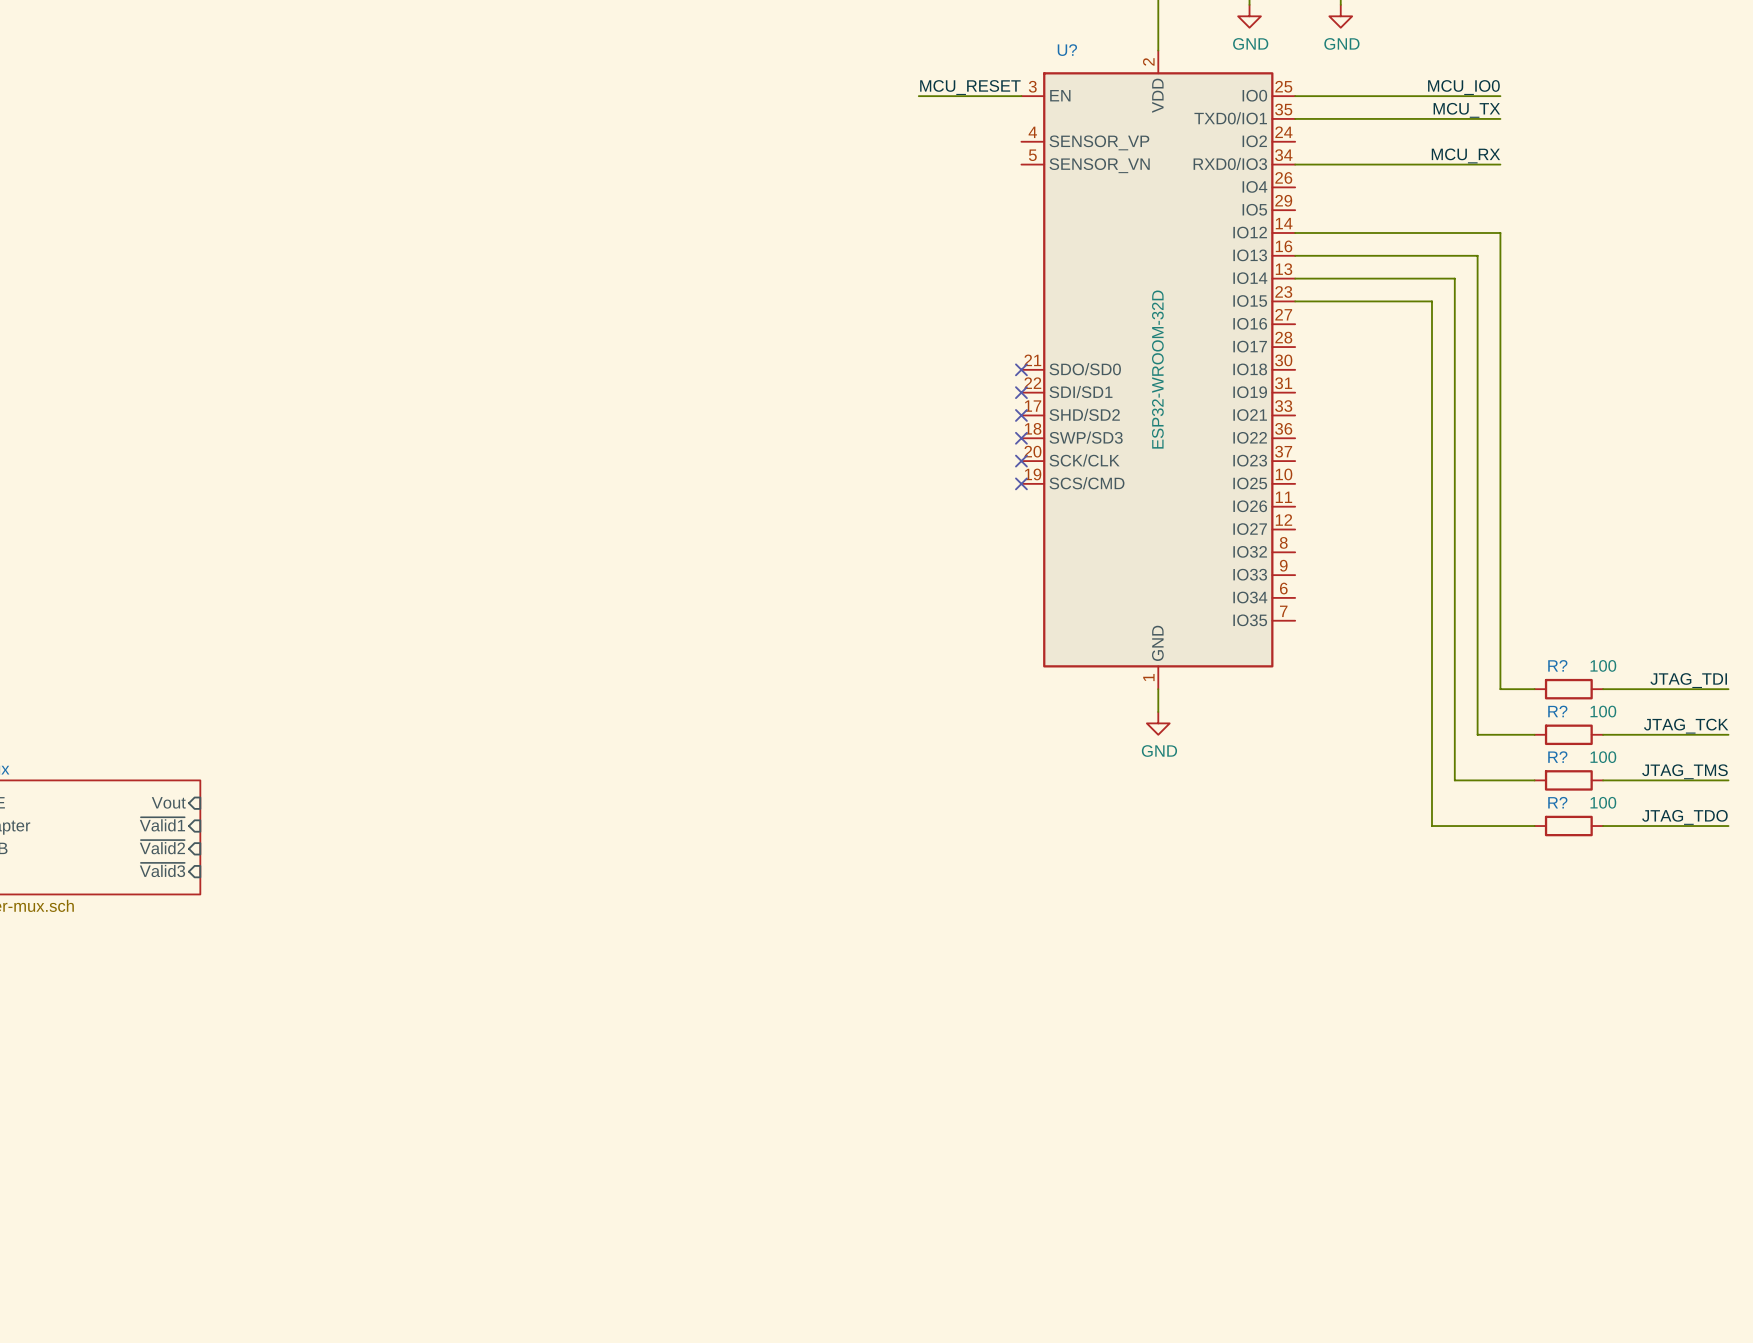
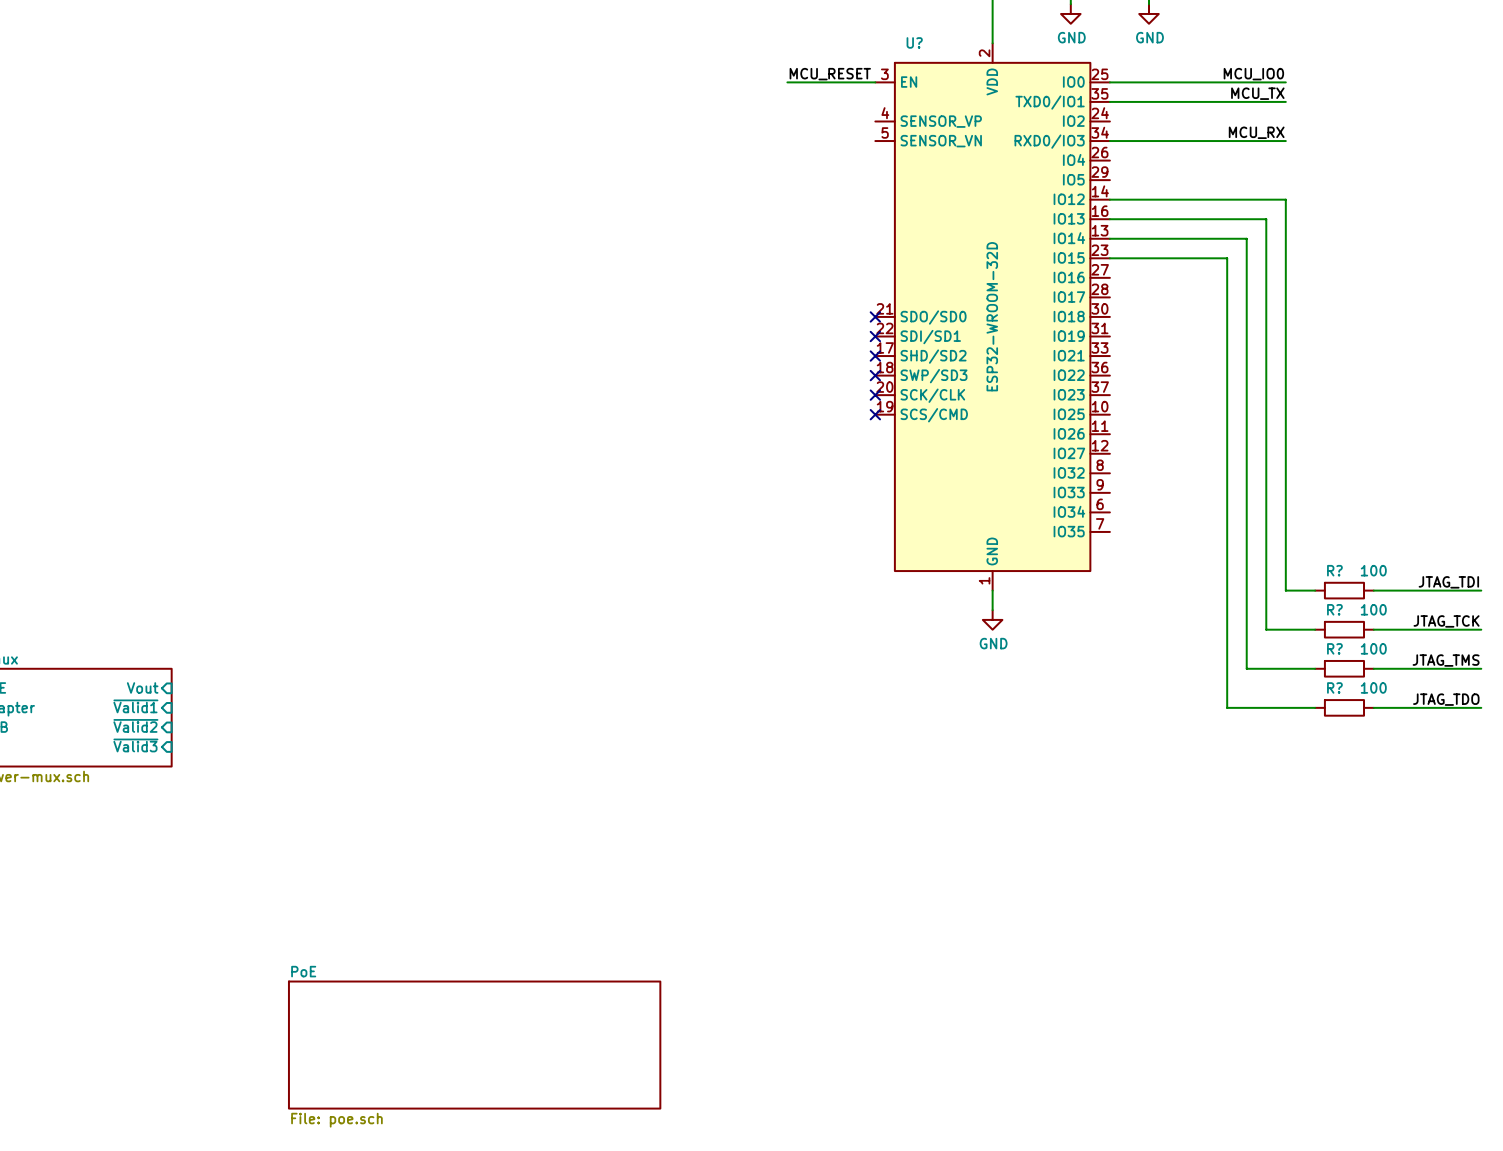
sheet PoE: none -> File: poe.sch (474, 1045)

